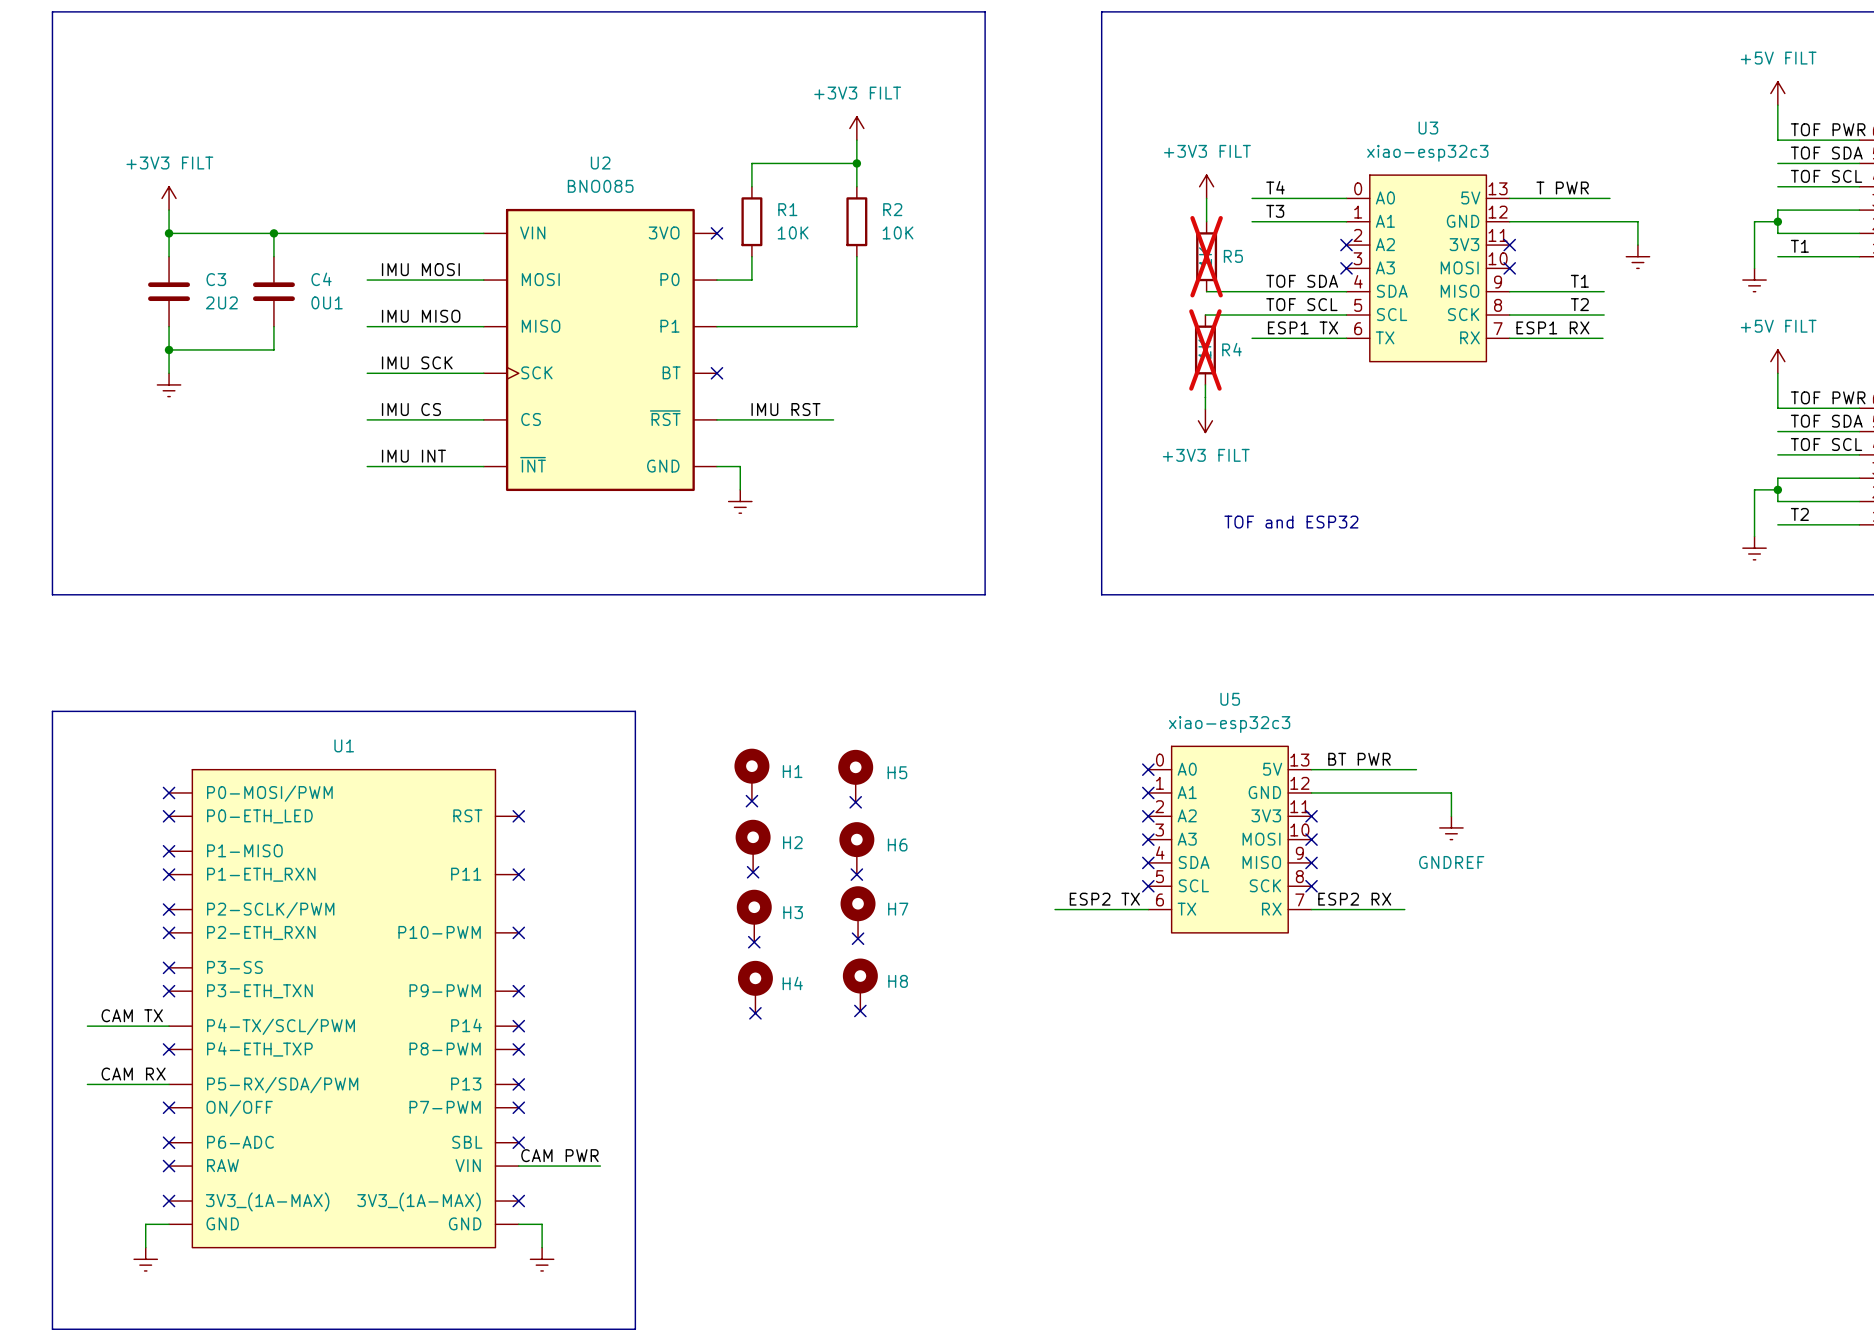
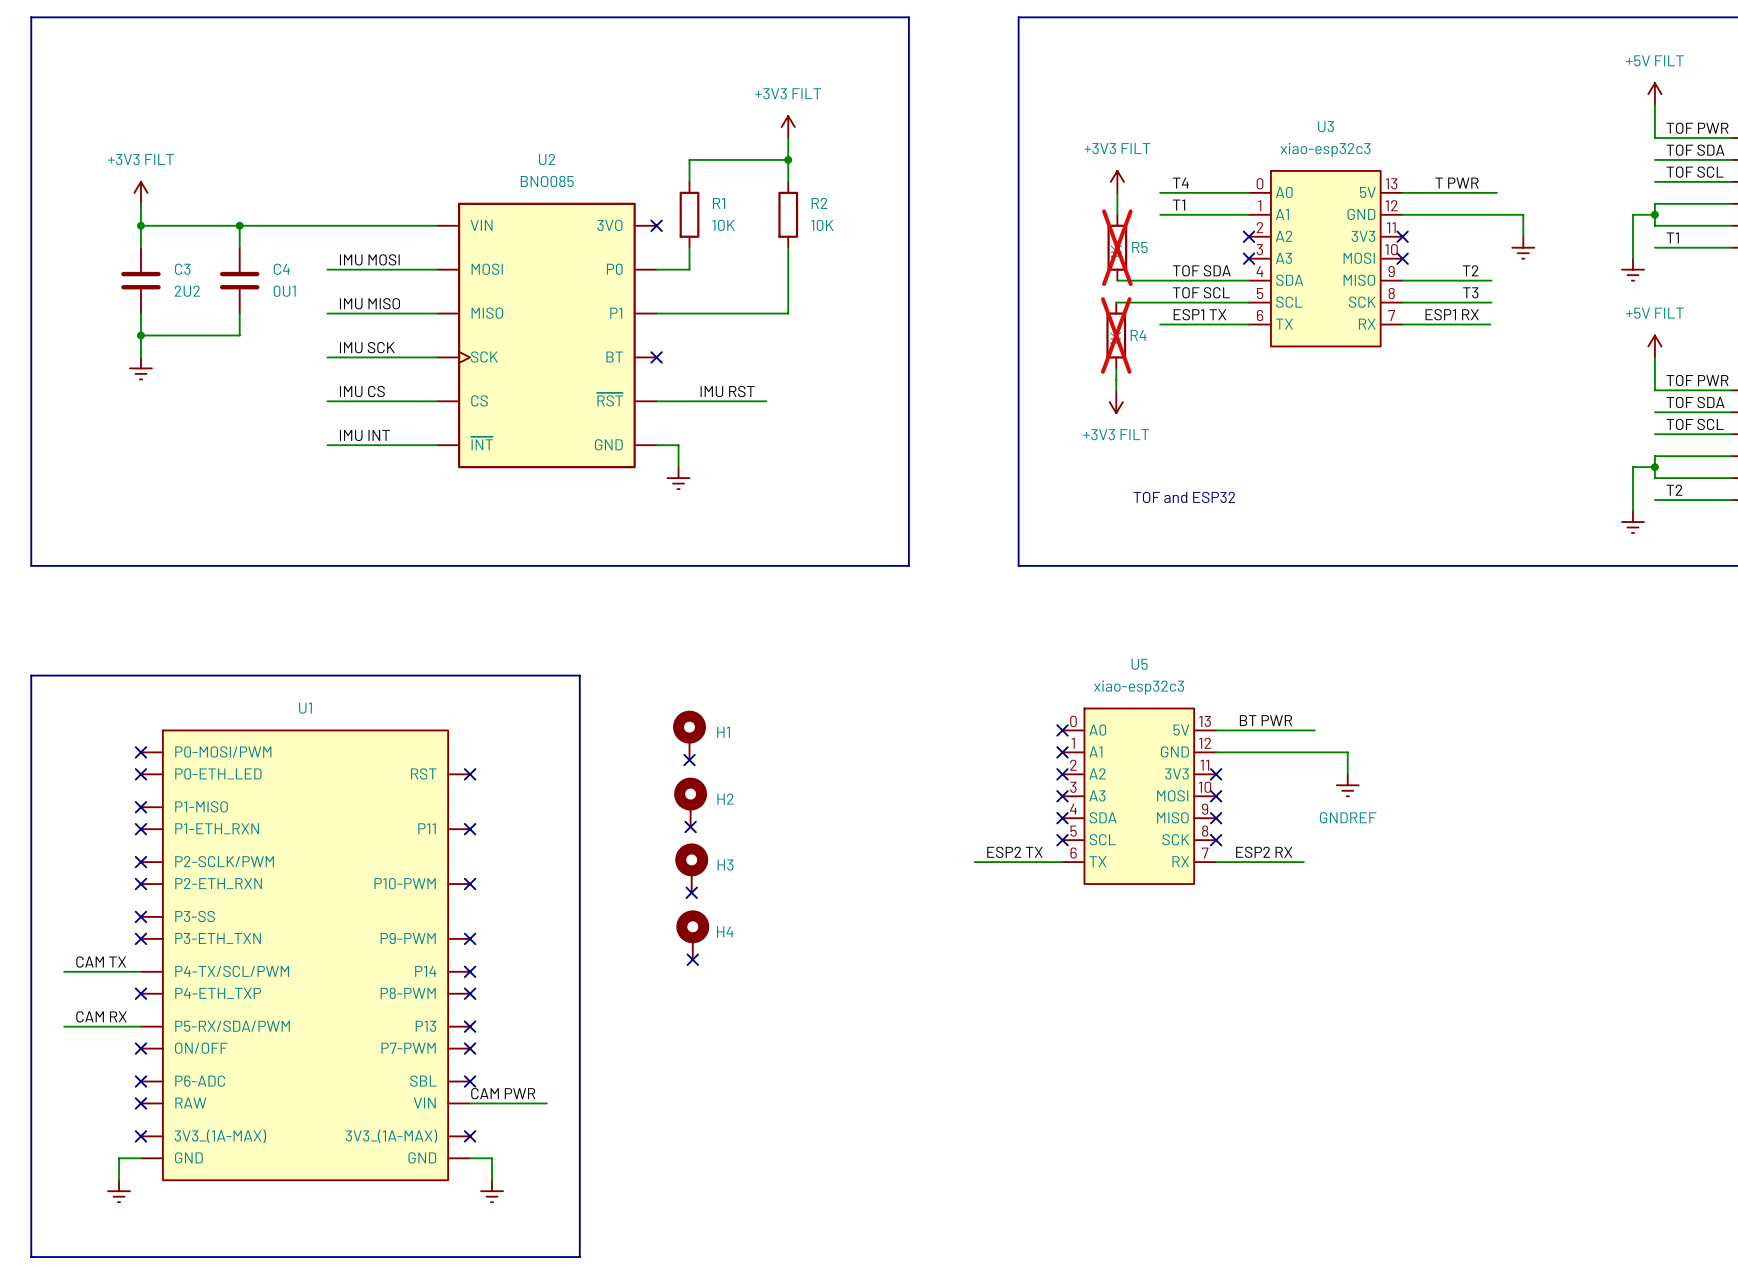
label: T3 (1275, 211) -> T1 (1179, 205)
label: T1 (1579, 281) -> T2 (1470, 270)
label: T2 (1579, 304) -> T3 (1470, 292)
H5: (855, 776) -> none
no-connect mark: (855, 802) -> none
H6: (856, 848) -> none
no-connect mark: (856, 874) -> none
H7: (858, 912) -> none
no-connect mark: (858, 938) -> none
H8: (860, 984) -> none
no-connect mark: (860, 1010) -> none

